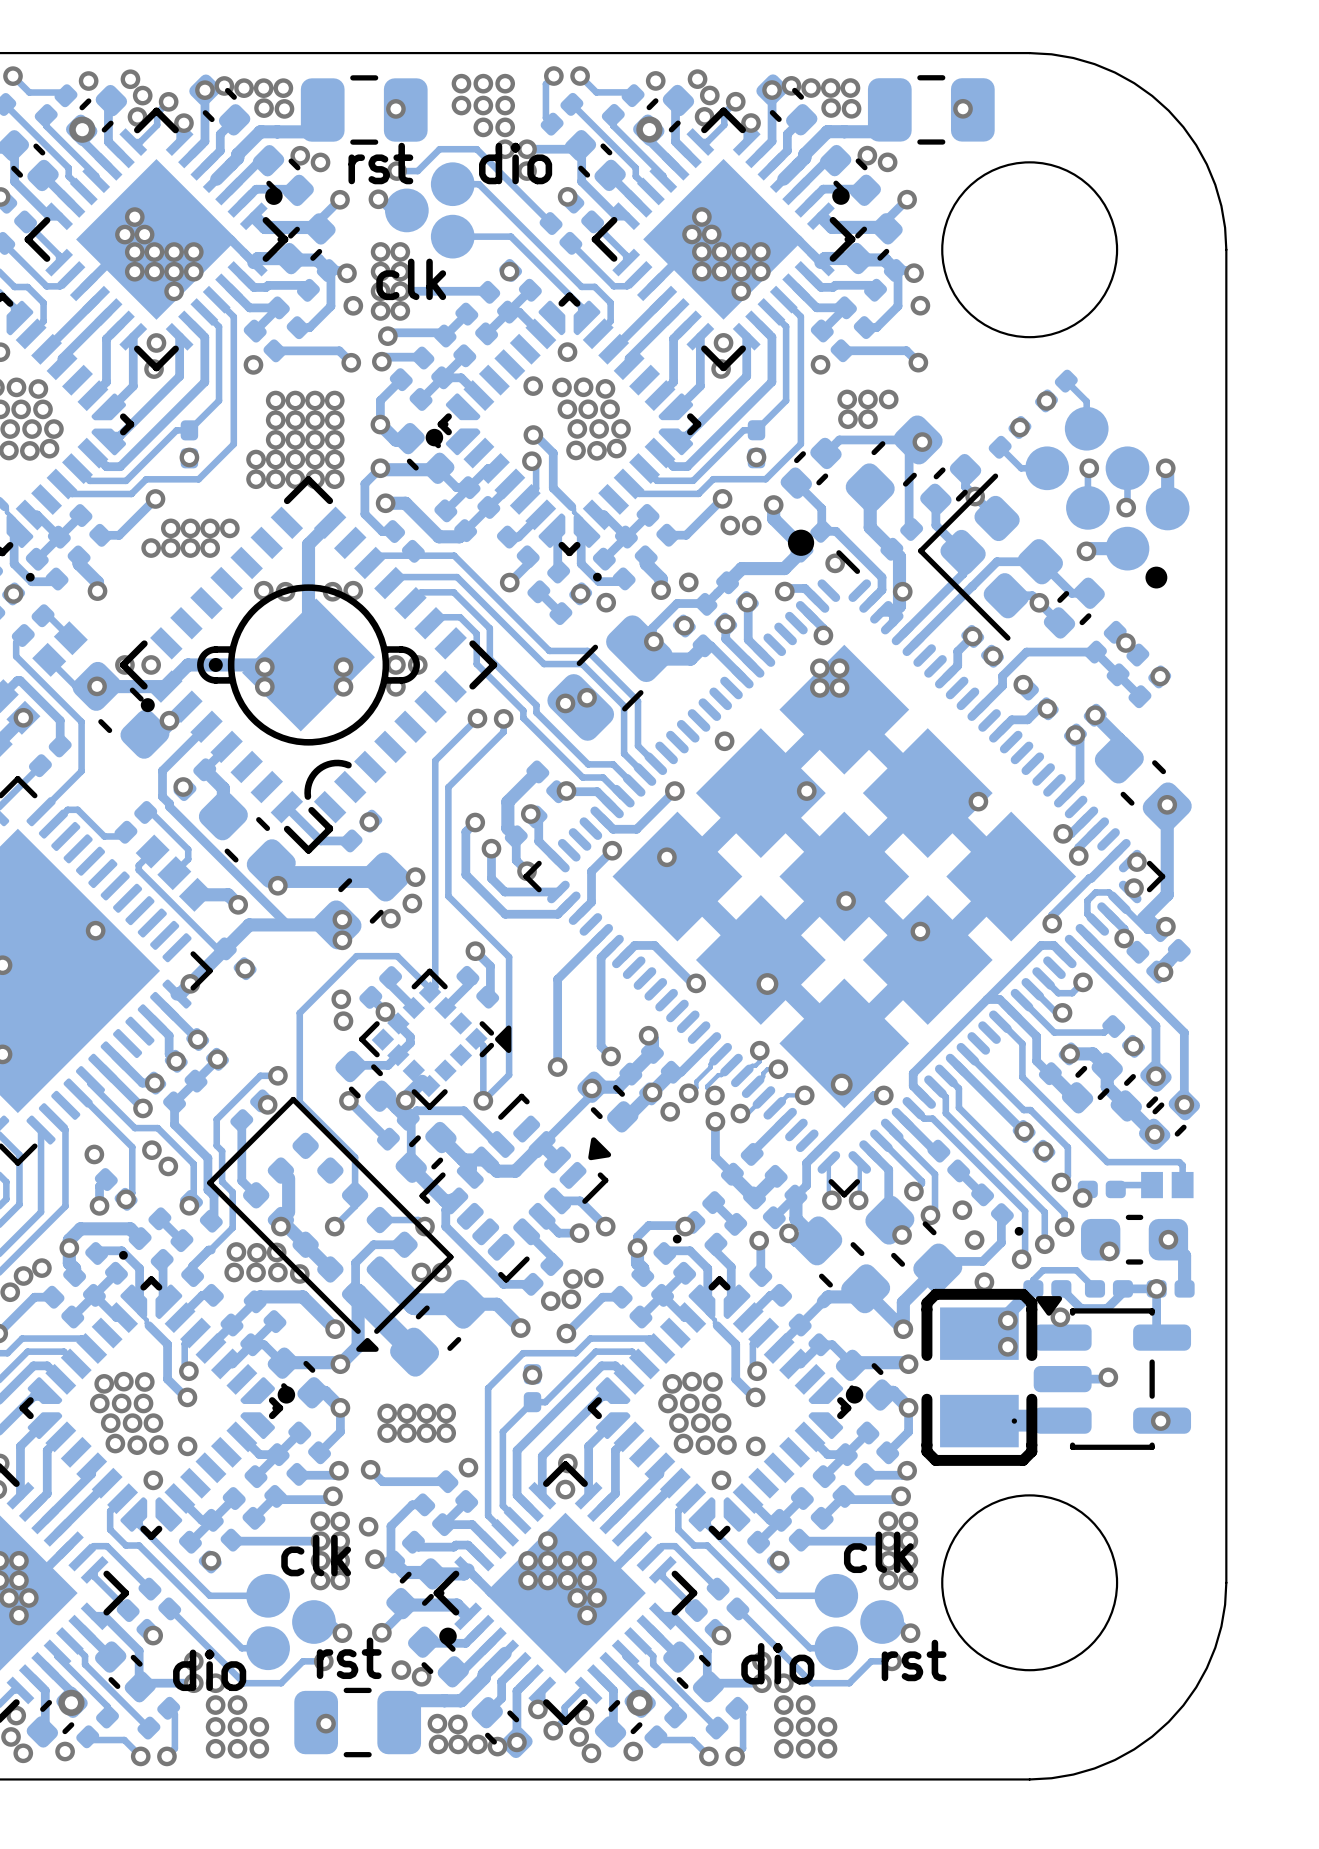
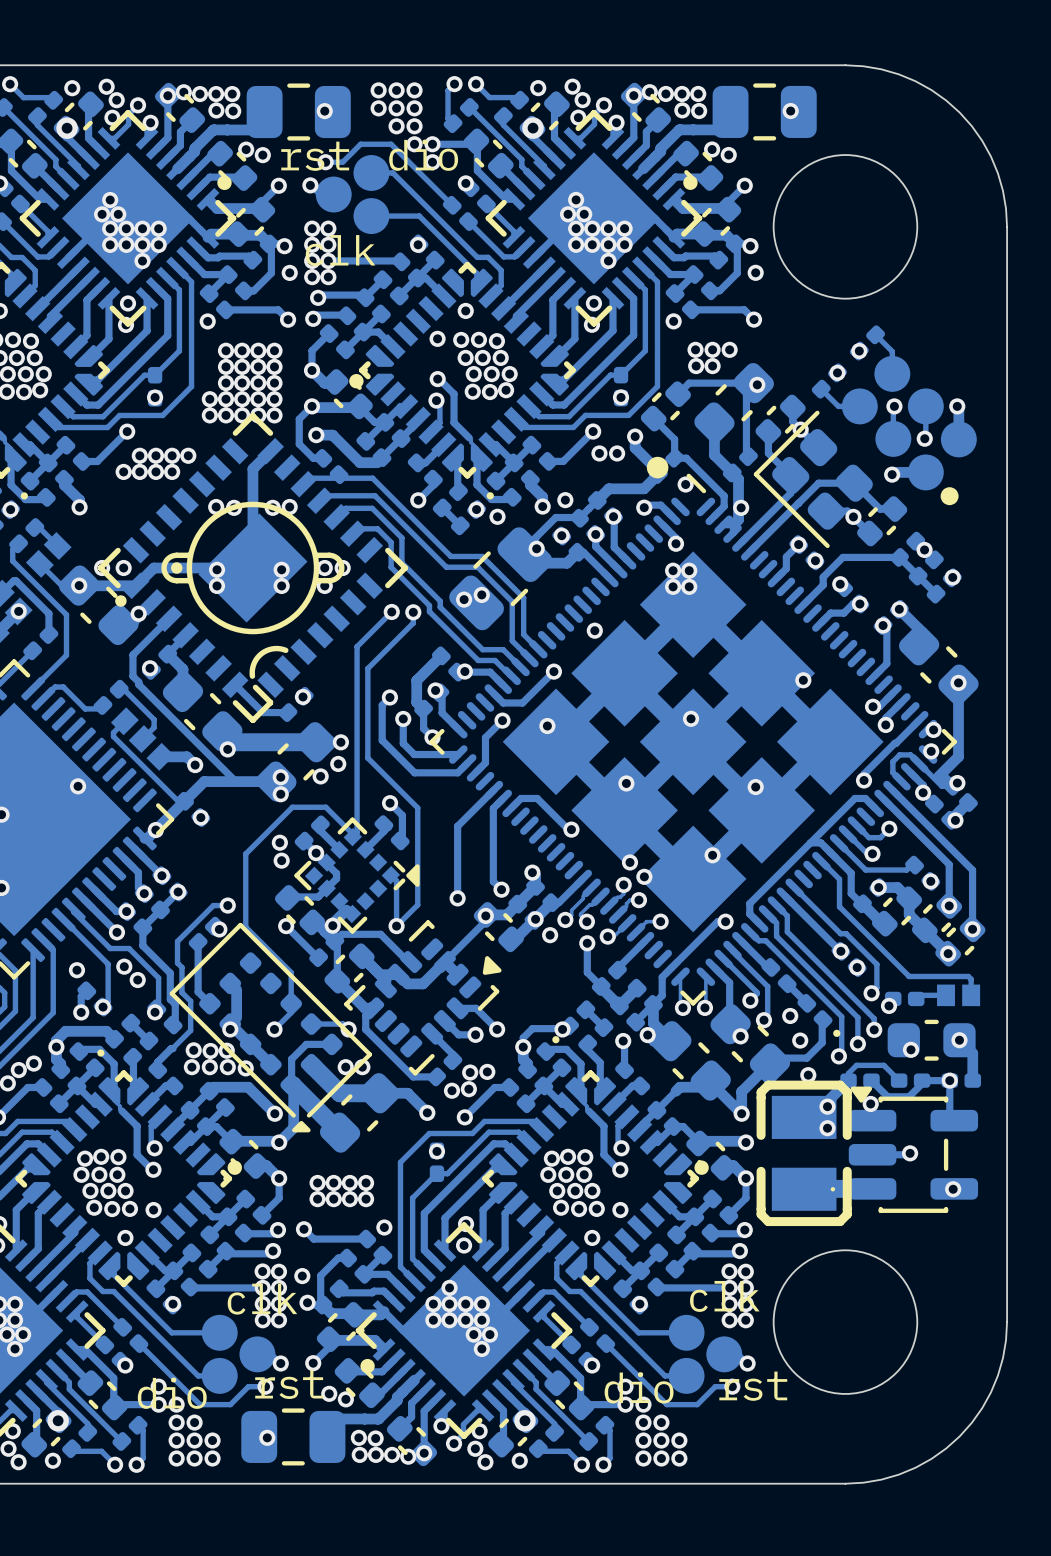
via: (806, 791) -> none
via: none -> (691, 718)
via: (846, 900) -> none
via: none -> (626, 783)
via: (767, 984) -> none
via: none -> (712, 855)
via: none -> (629, 862)
via: none -> (644, 876)
via: (841, 1084) -> none

